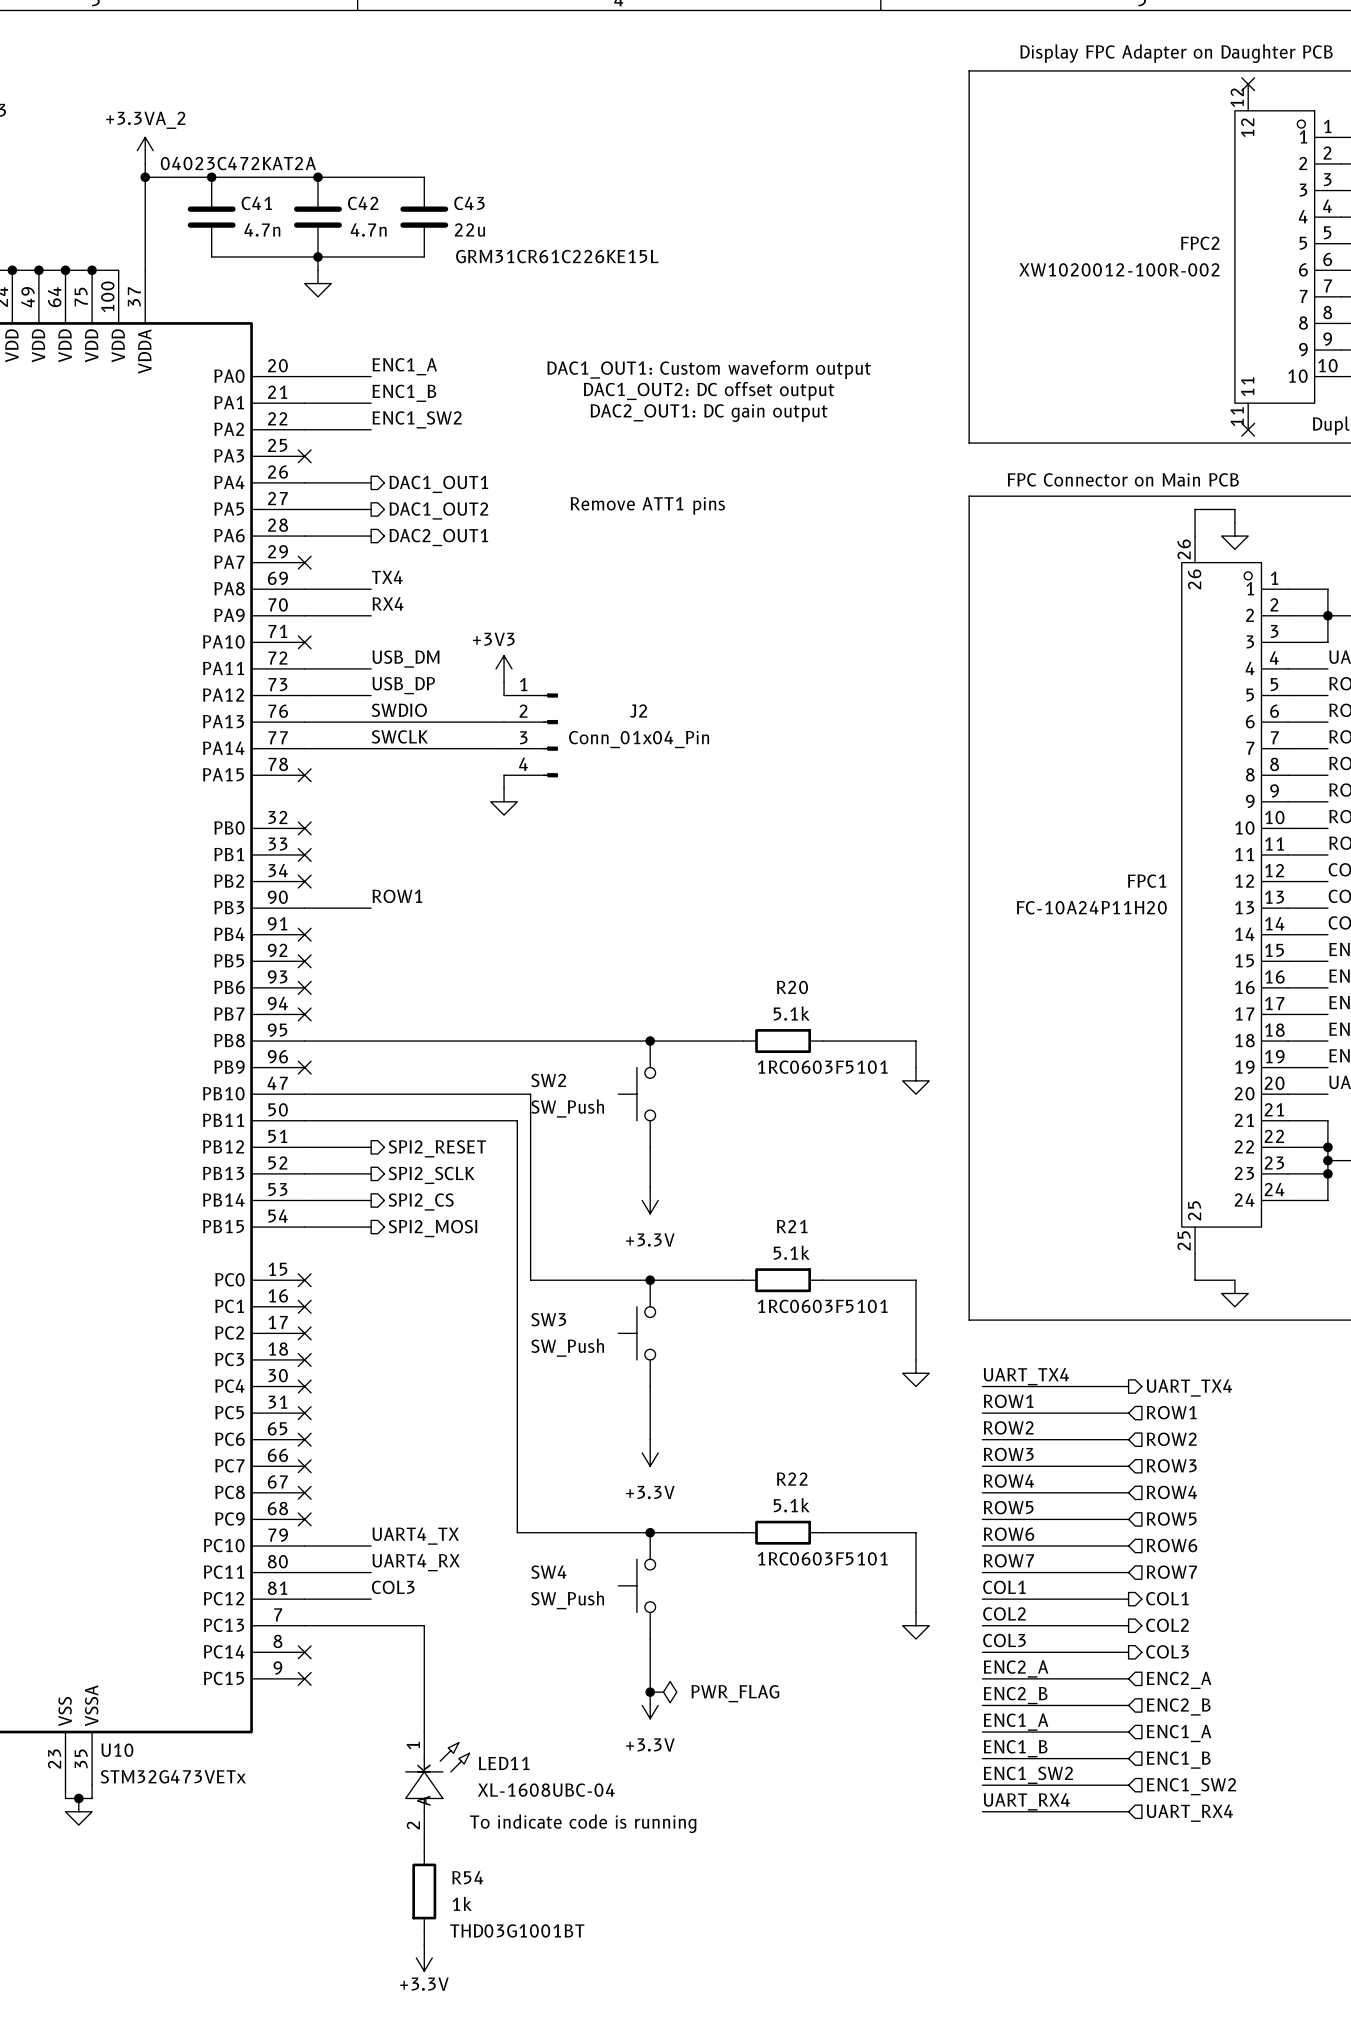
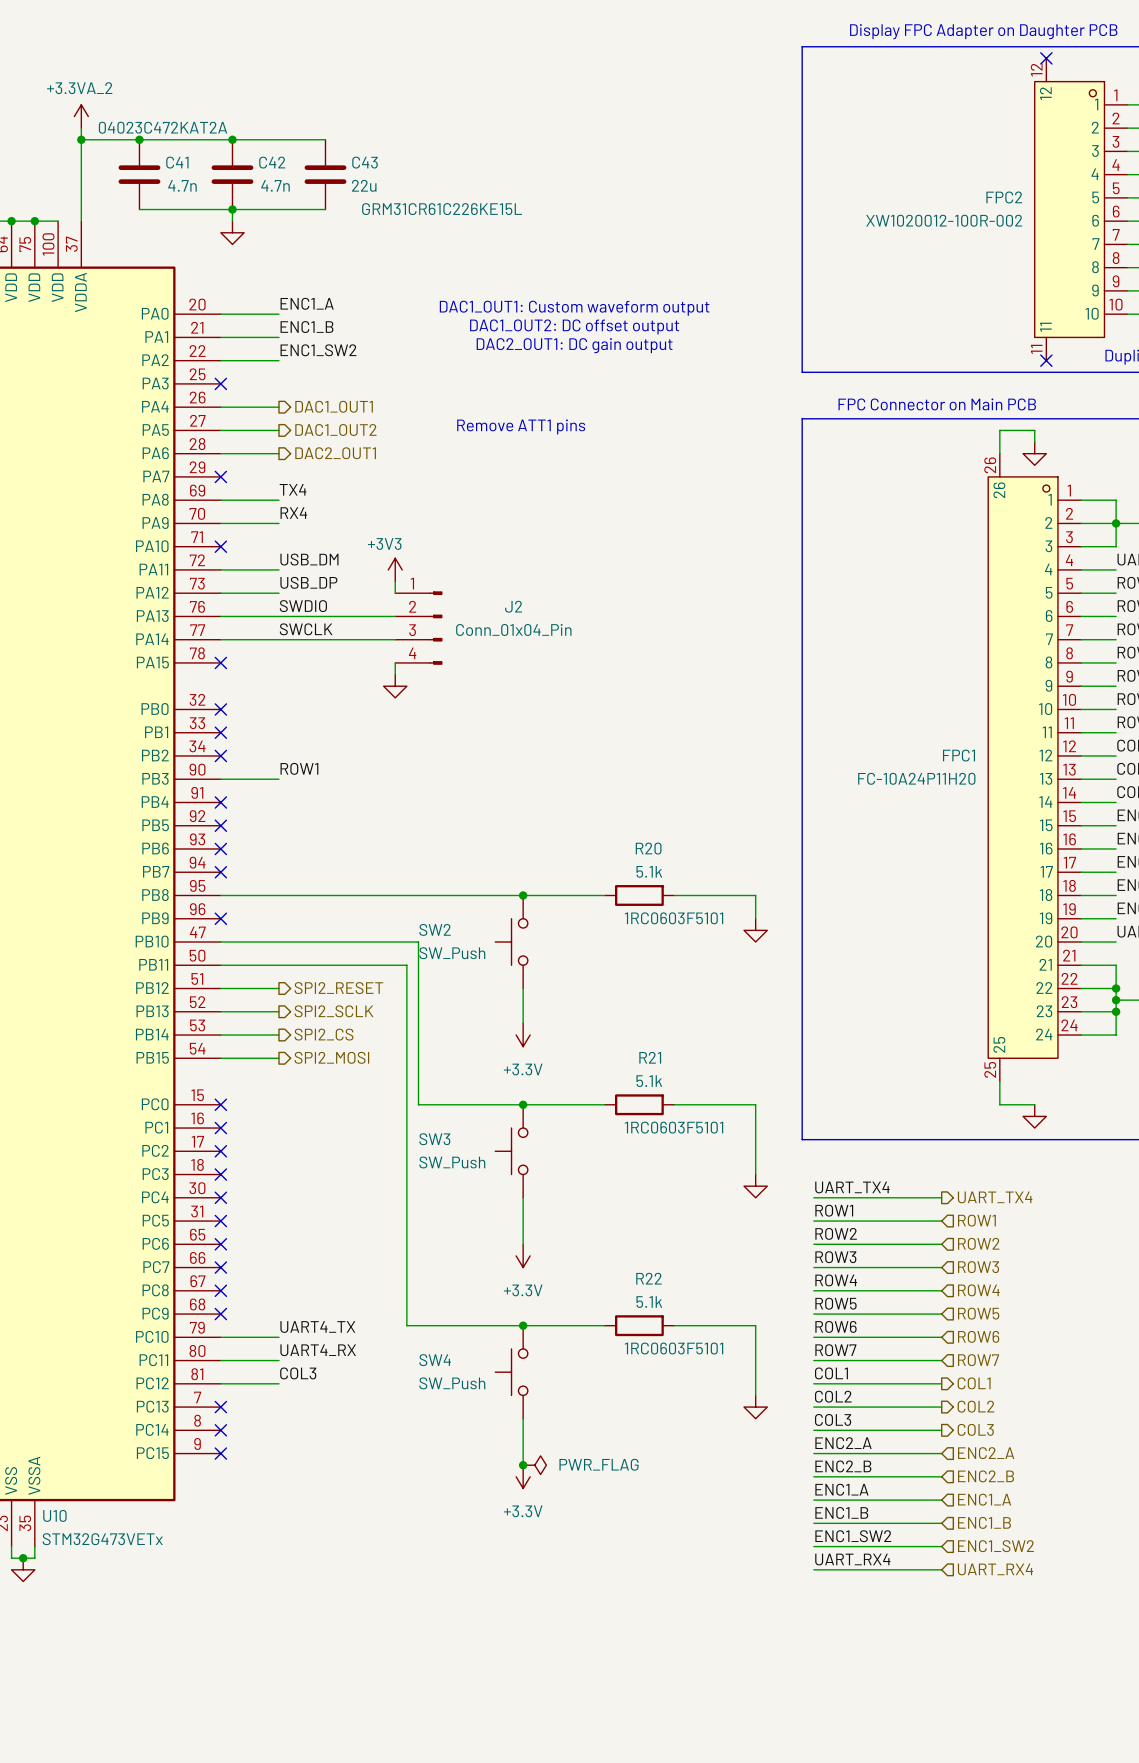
wire: (304, 1625) (424, 1625) (424, 1732) -> none
no-connect mark: none -> (220, 1407)
LED11: XL-1608UBC-04 (437, 1785) -> none
text: To indicate code is running (583, 1823) -> none
wire: (424, 1838) (424, 1851) -> none
R54: 1k (424, 1891) -> none
wire: (424, 1931) (424, 1944) -> none
power symbol: +3.3V (424, 1957) -> none

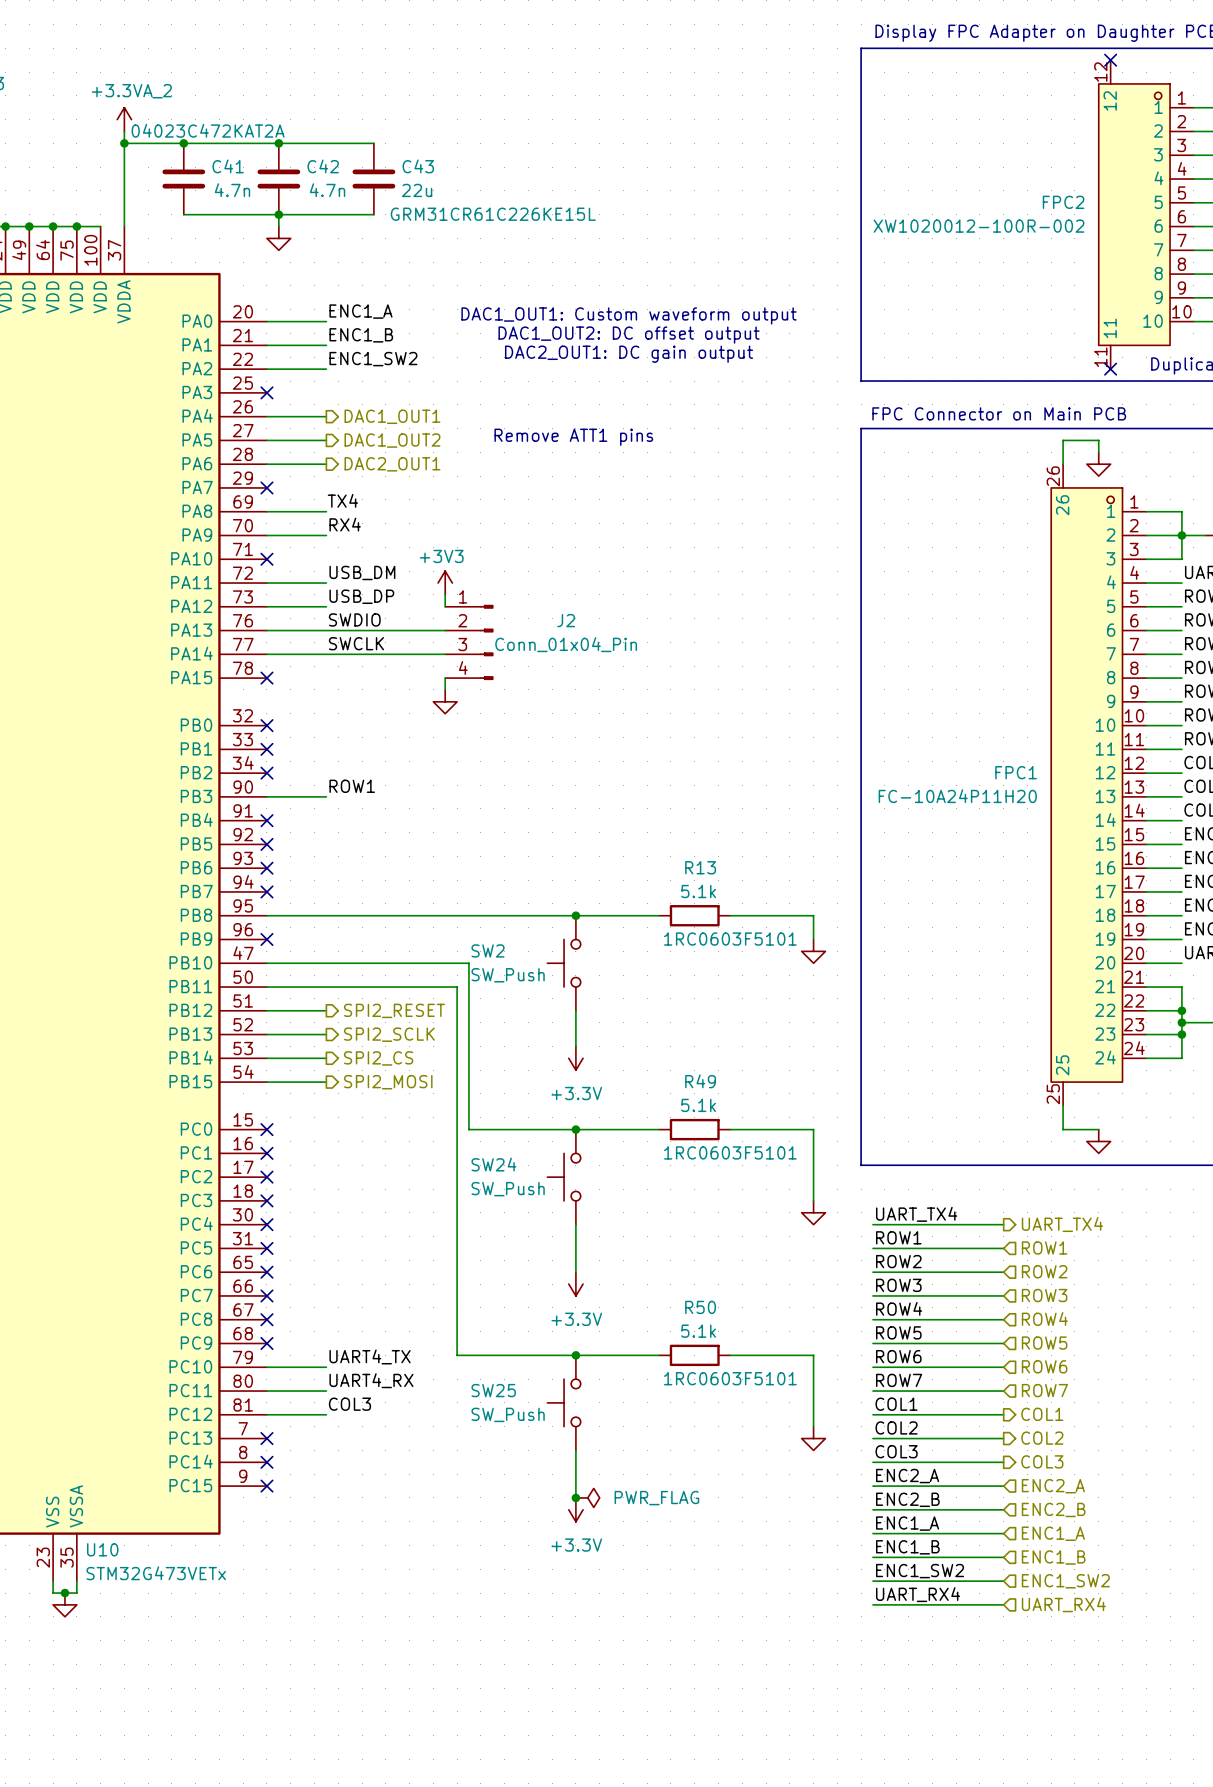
R20 name: R20 (648, 848) -> R13 (700, 867)
R21 name: R21 (650, 1057) -> R49 (700, 1081)
SW3 name: SW3 (434, 1139) -> SW24 (493, 1164)
R22 name: R22 (648, 1278) -> R50 (700, 1307)
SW4 name: SW4 (435, 1360) -> SW25 (493, 1390)

